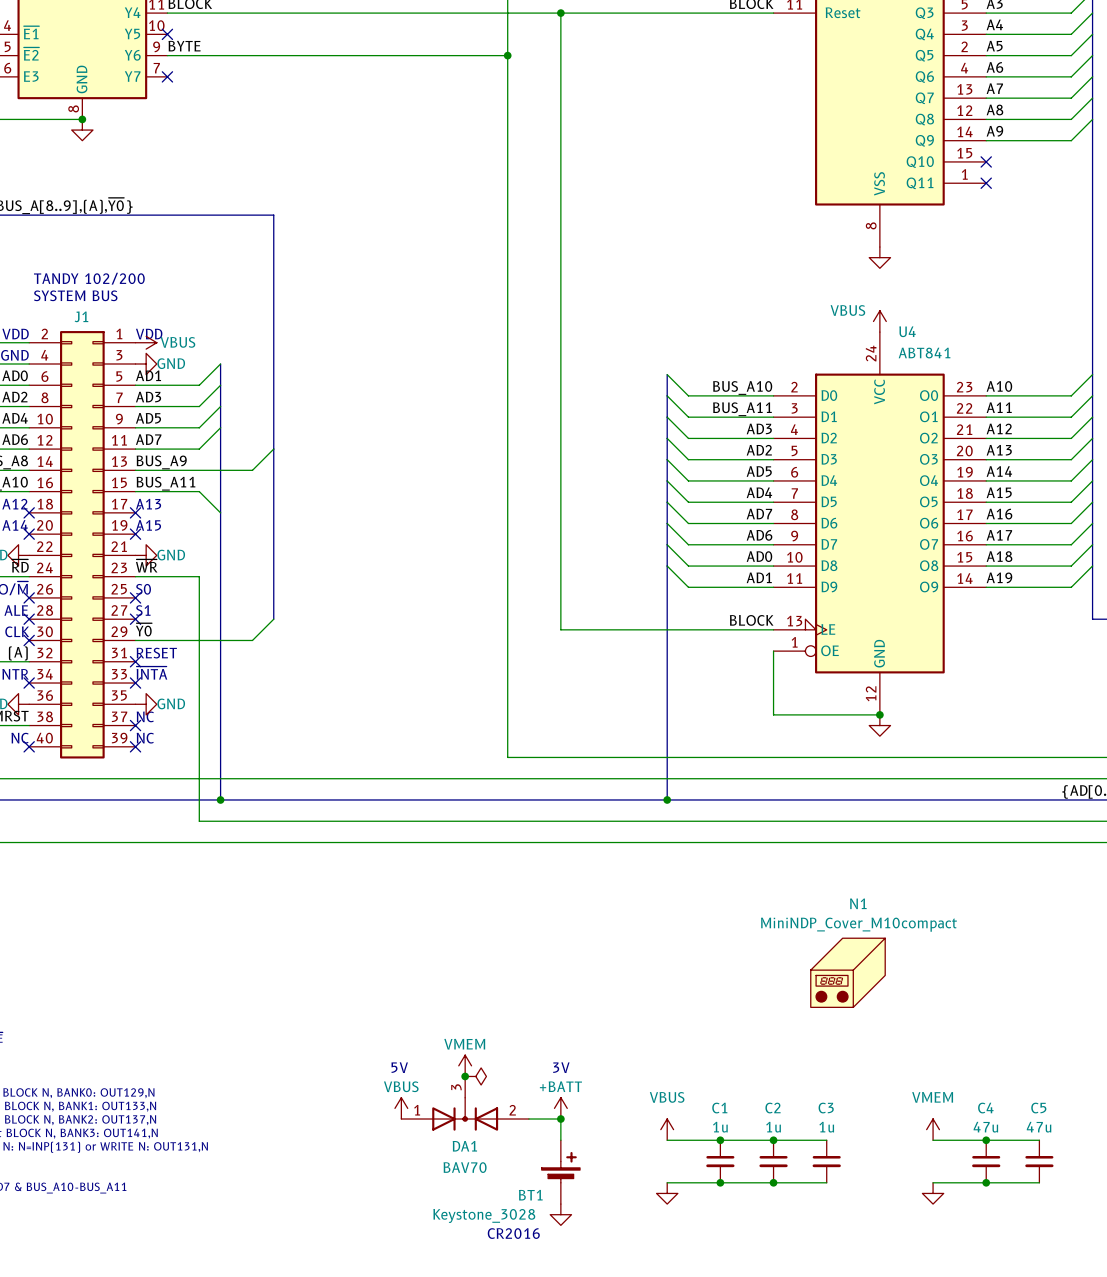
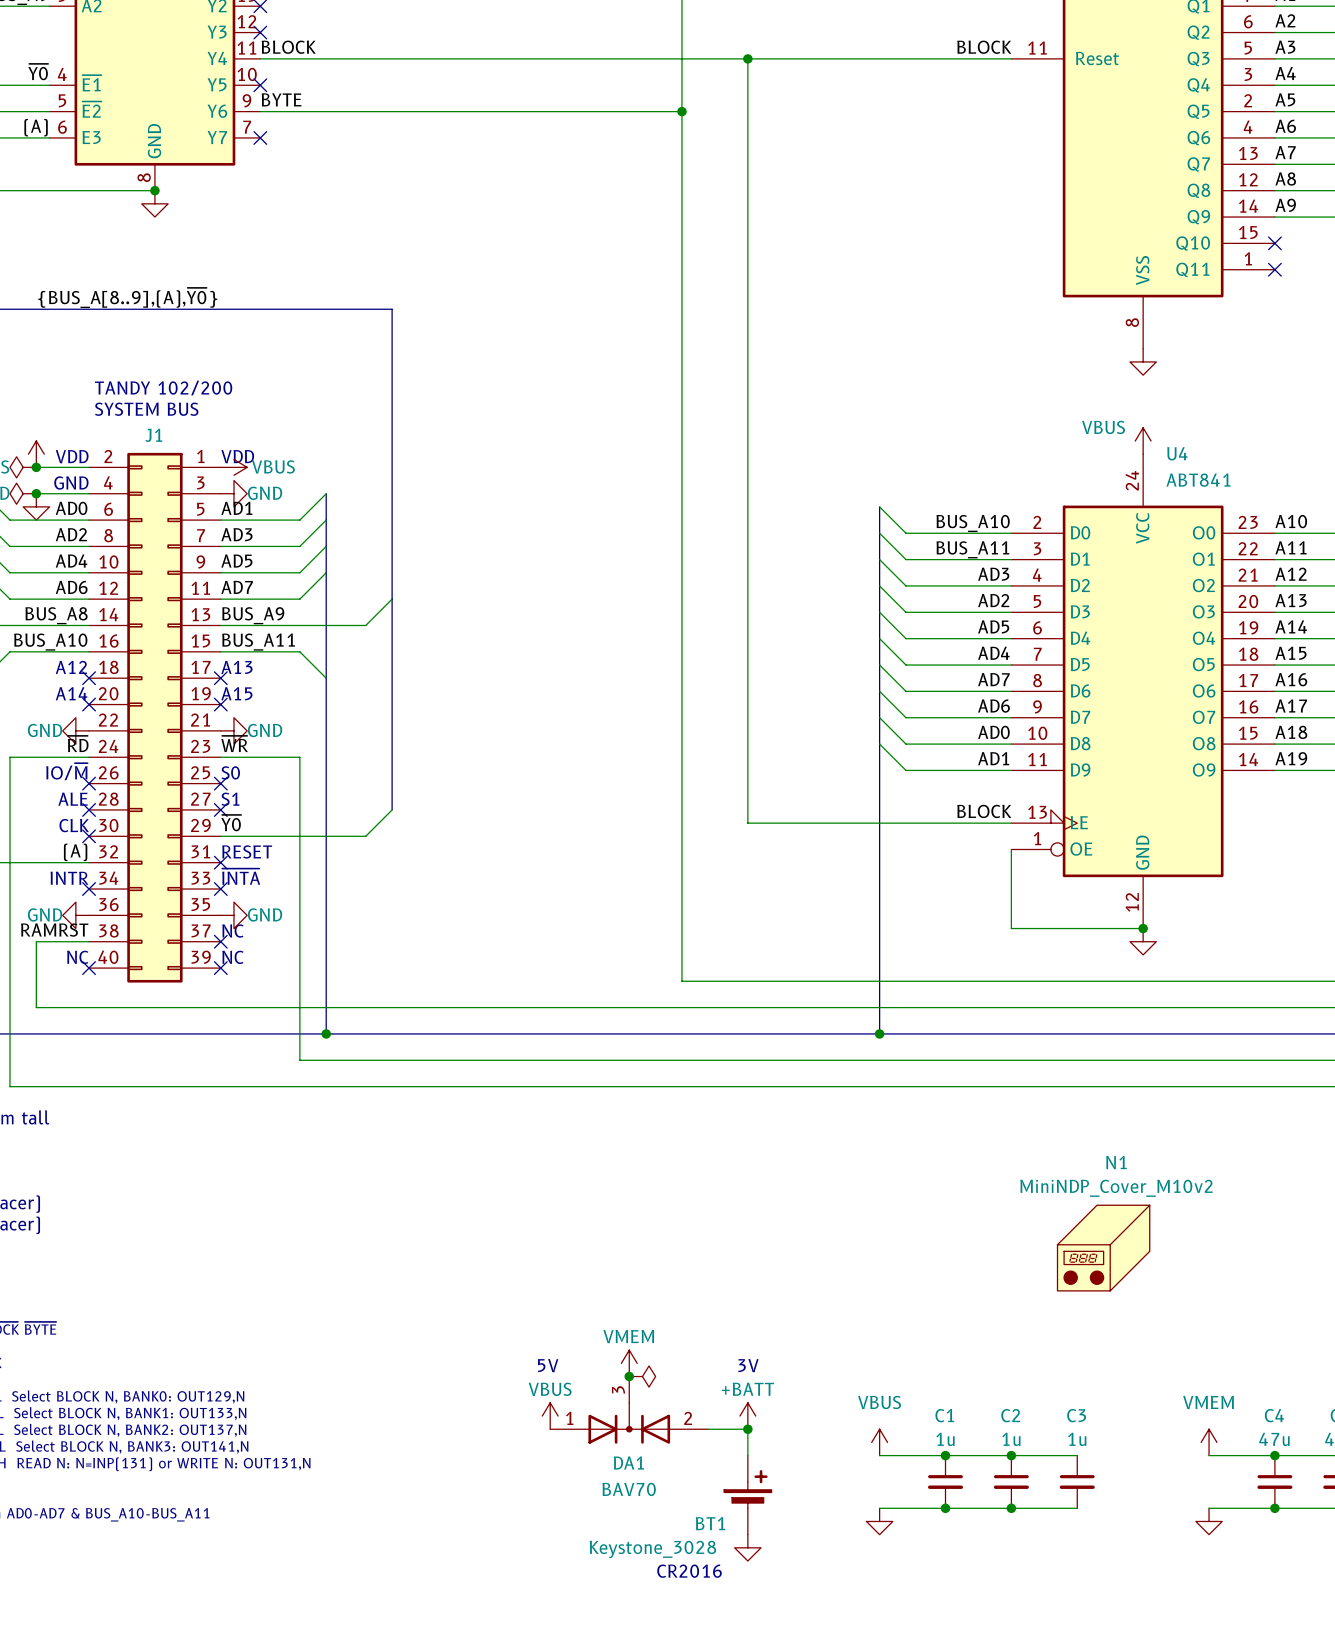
N1 value: MiniNDP_Cover_M10compact (858, 924) -> MiniNDP_Cover_M10v2 (1116, 1188)

